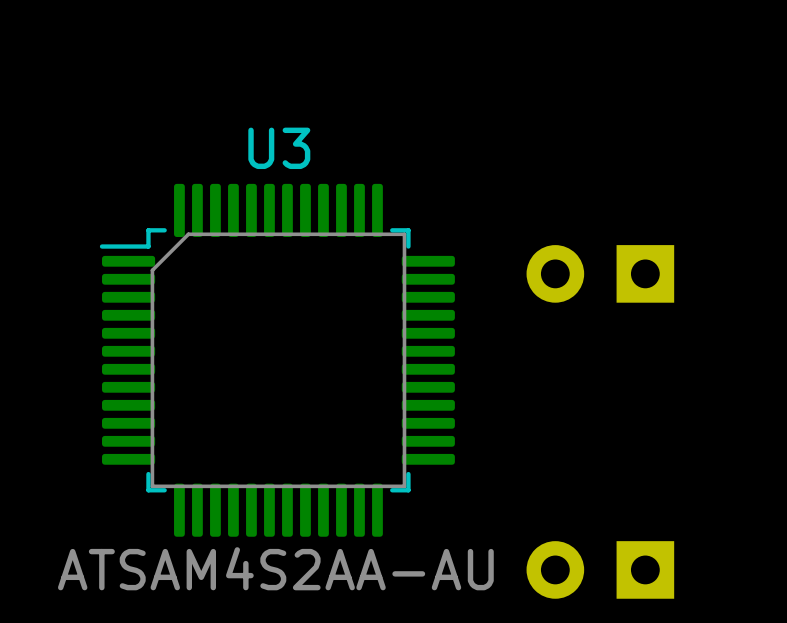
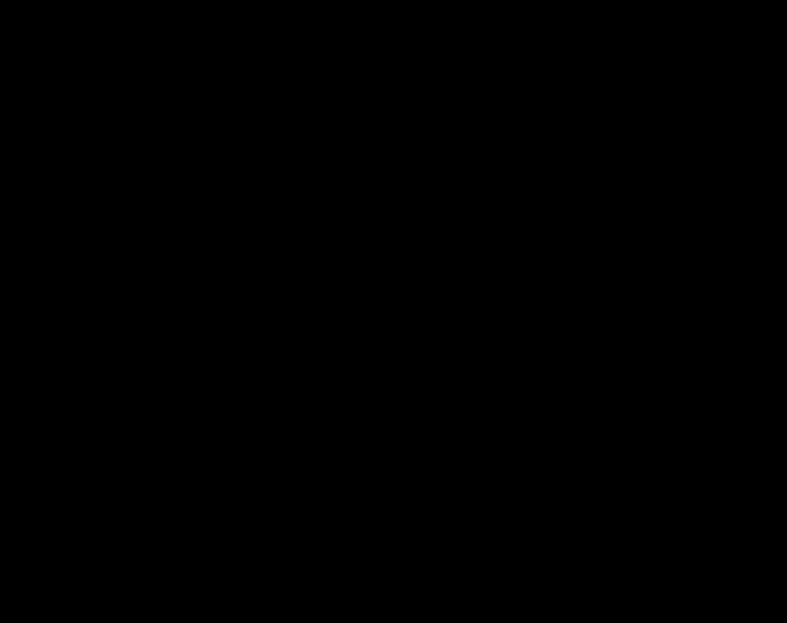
part: (600, 273) -> none
U3: ATSAM4S2AA-AU (277, 360) -> none
part: (600, 569) -> none

